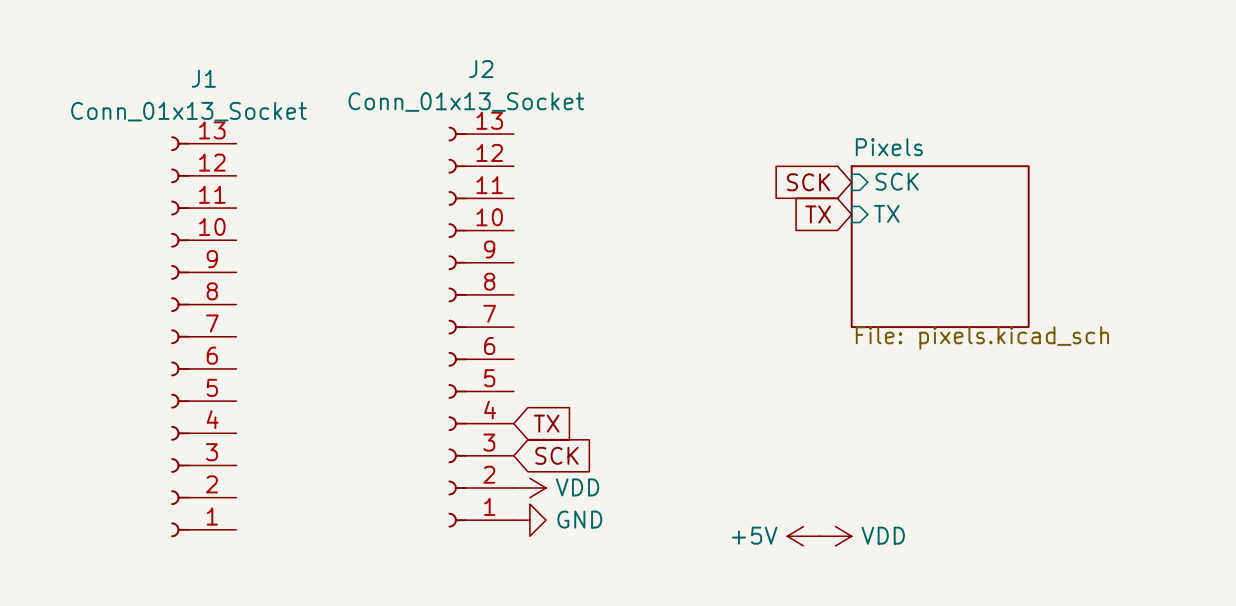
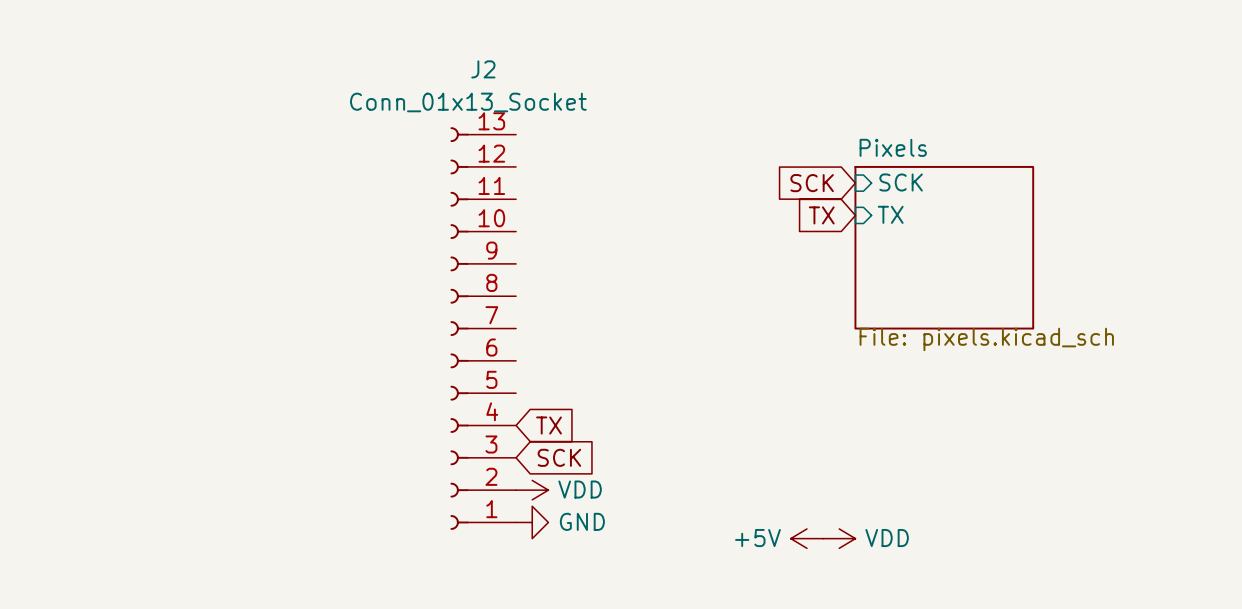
J1: Conn_01x13_Socket (203, 336) -> none

